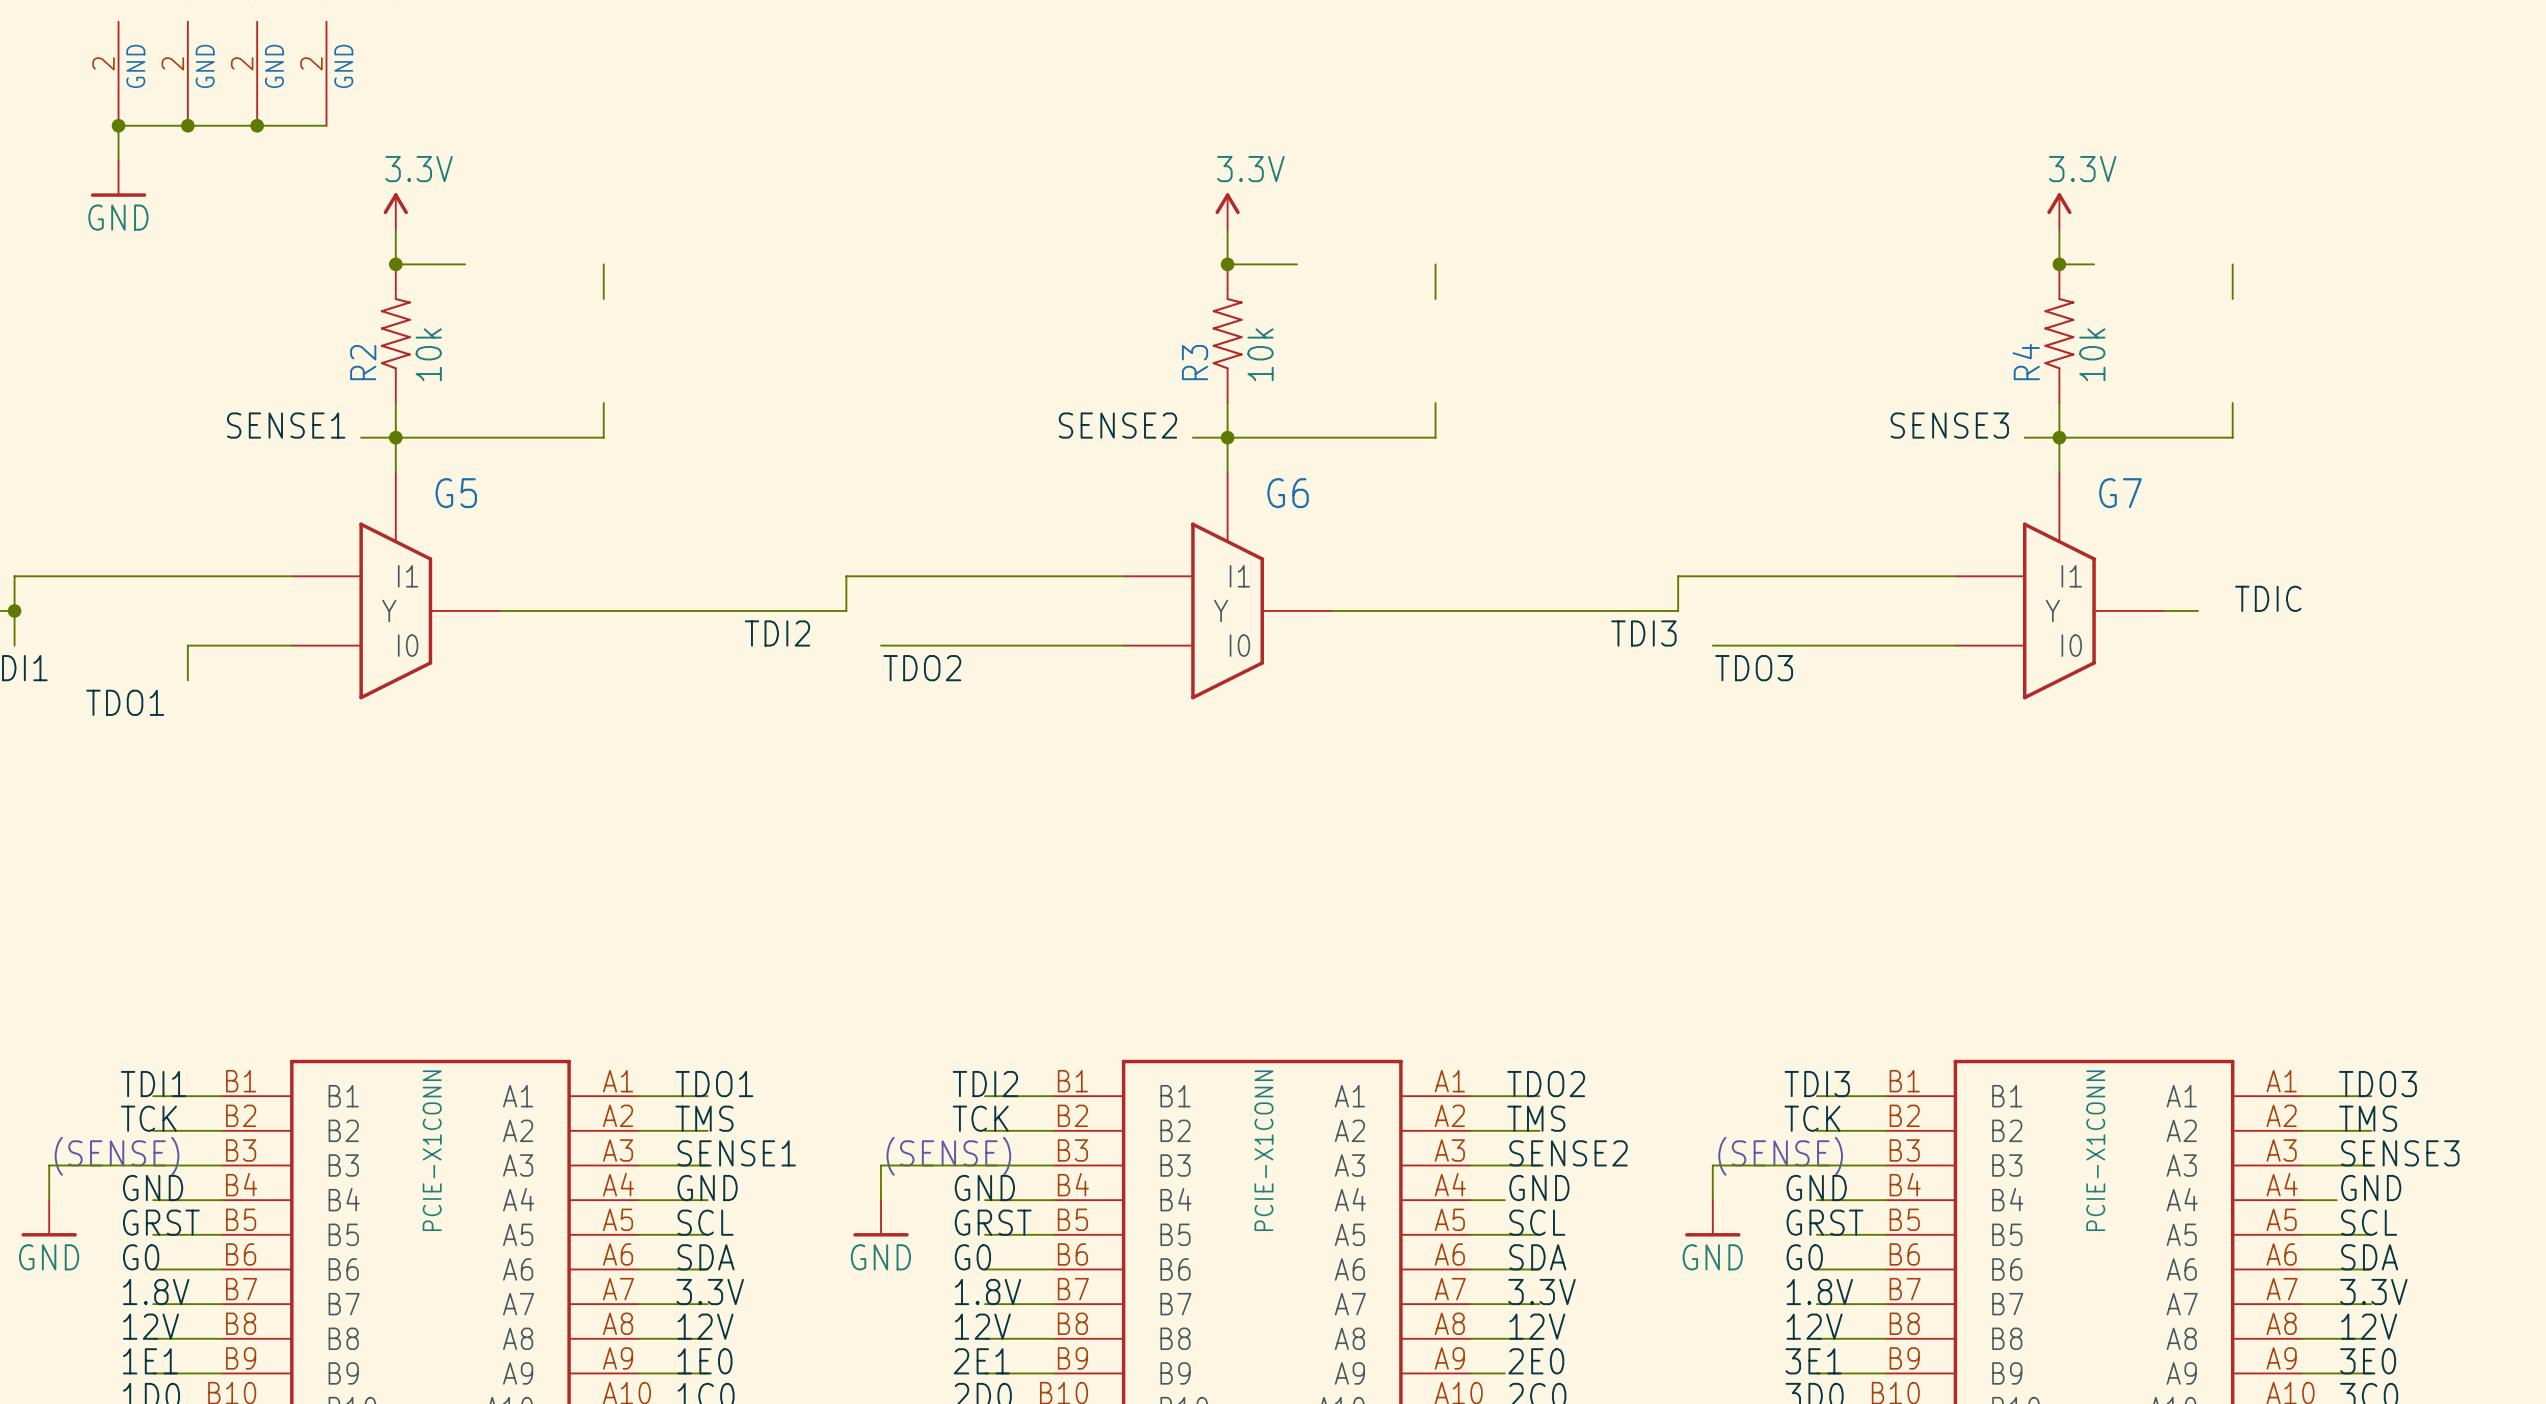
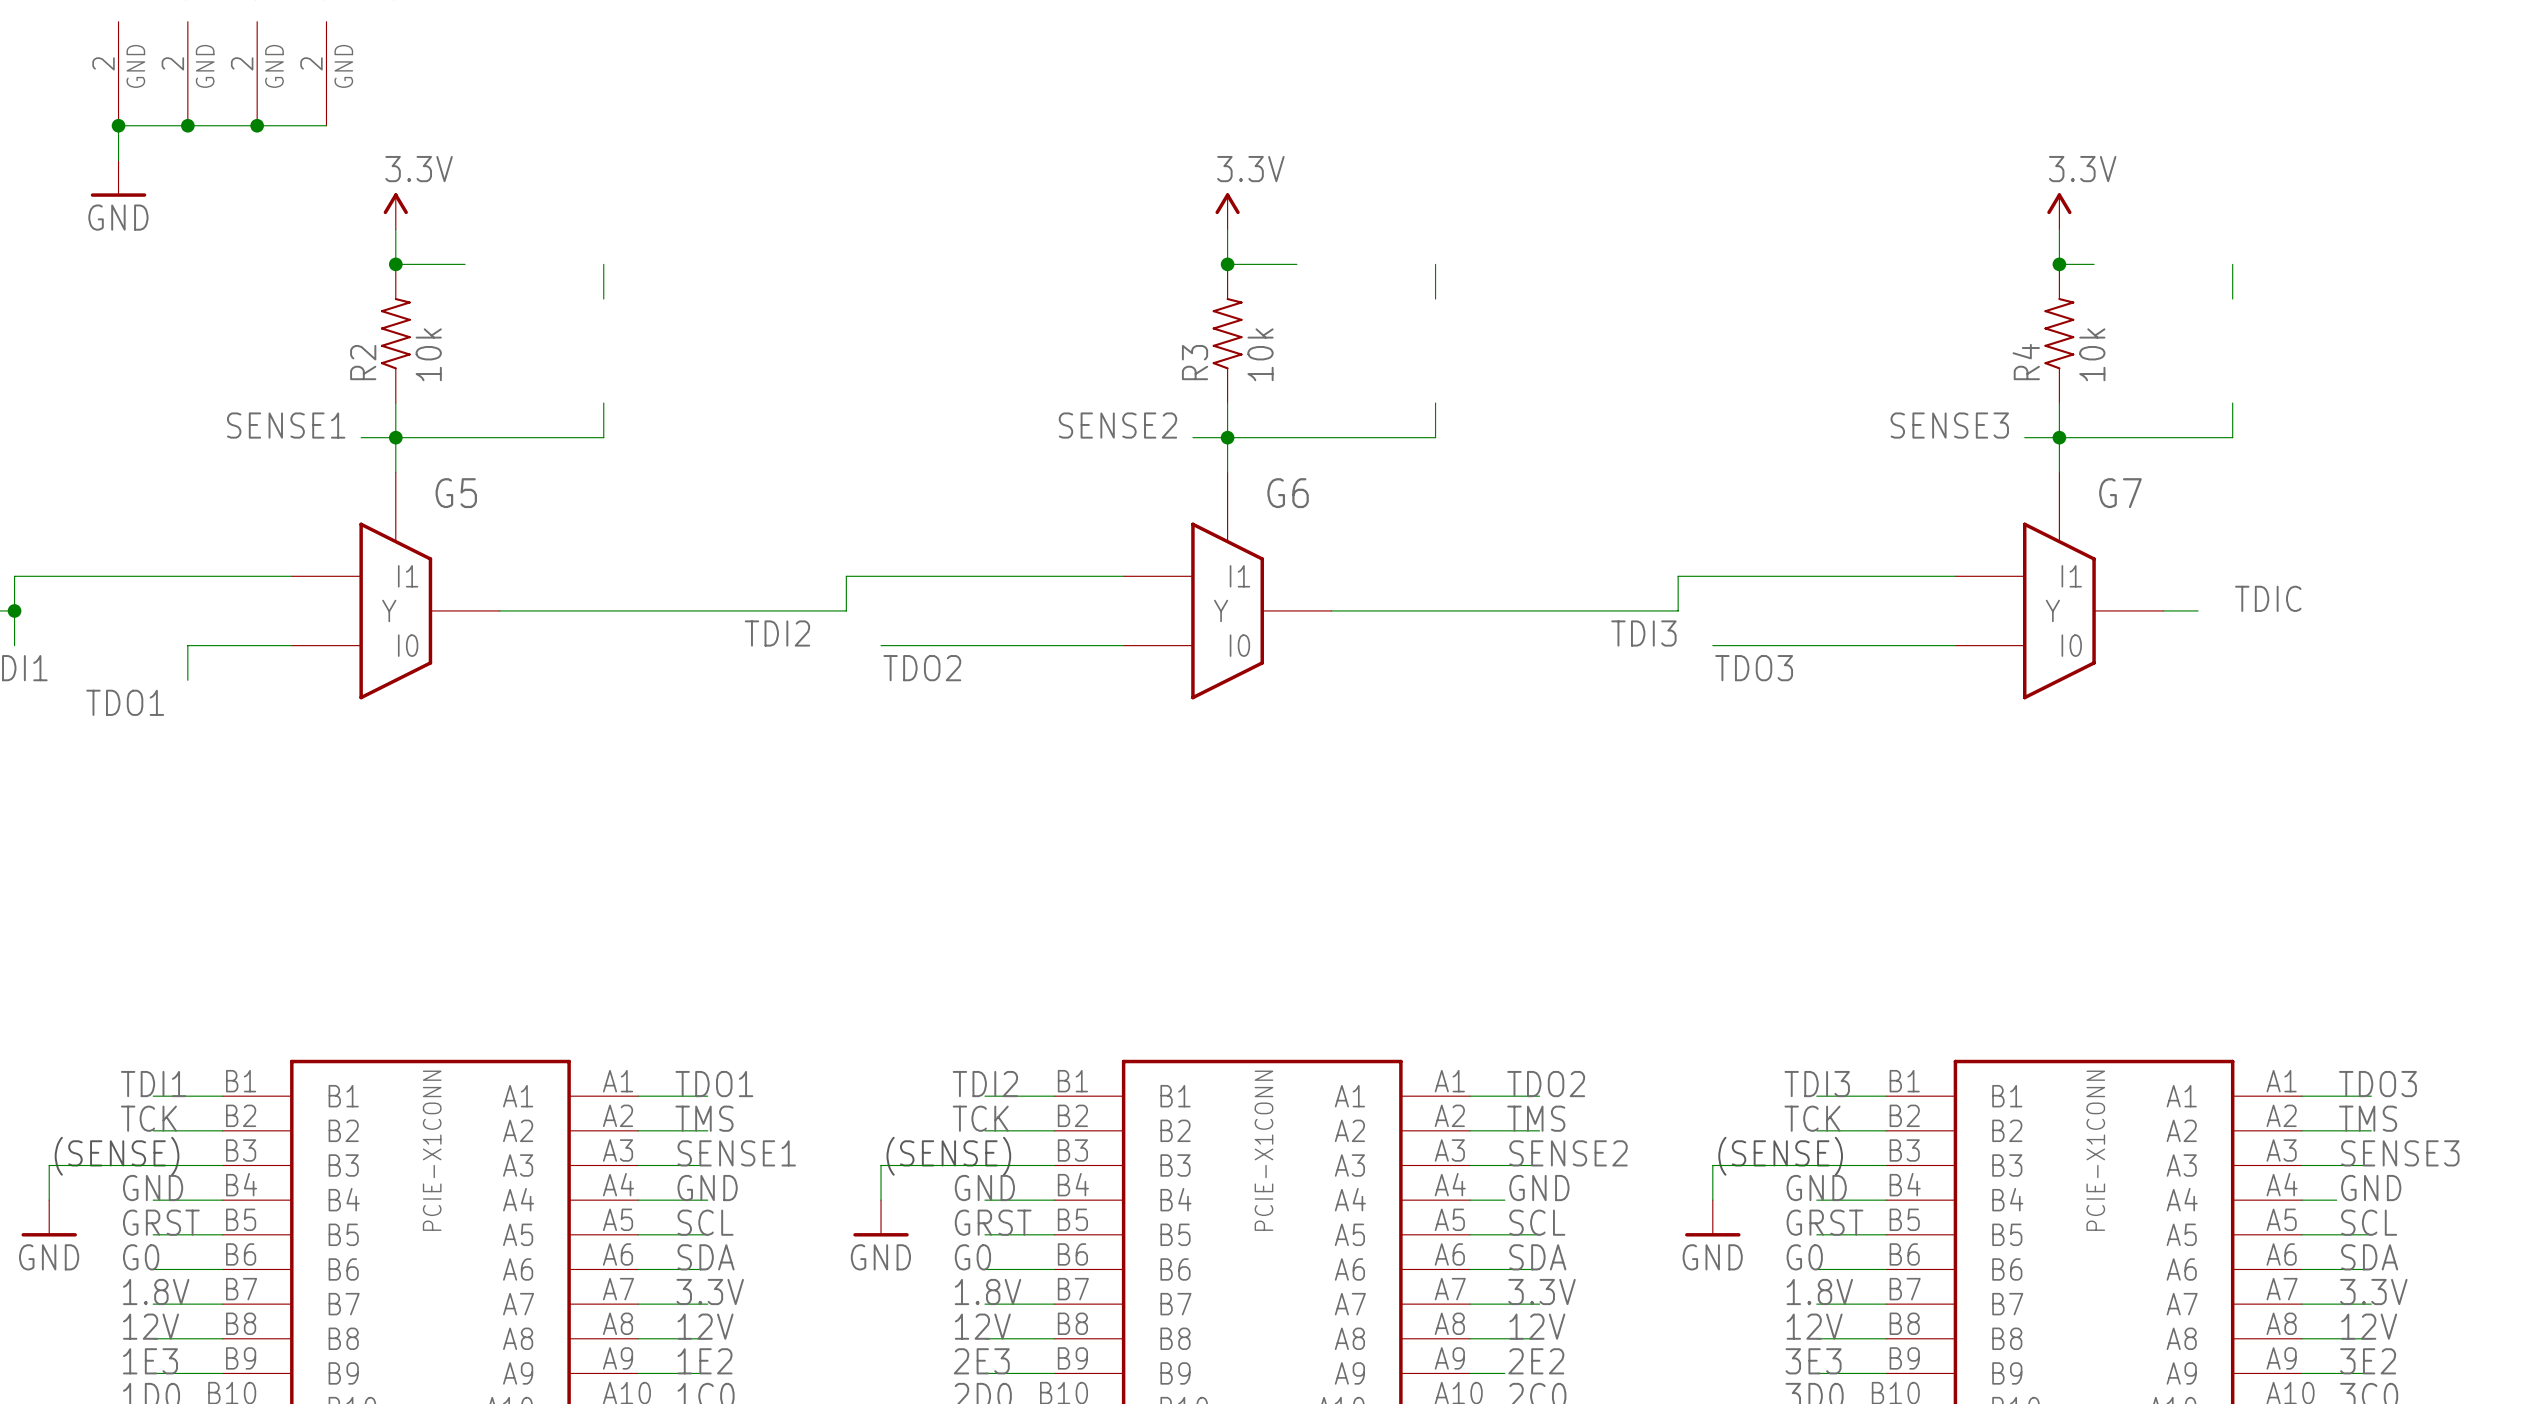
label: 1E1 (150, 1361) -> 1E3 (150, 1361)
label: 1E0 (705, 1361) -> 1E2 (705, 1361)
label: 2E1 (981, 1361) -> 2E3 (981, 1361)
label: 2E0 (1536, 1361) -> 2E2 (1536, 1361)
label: 3E1 (1813, 1361) -> 3E3 (1813, 1361)
label: 3E0 (2368, 1361) -> 3E2 (2368, 1361)

